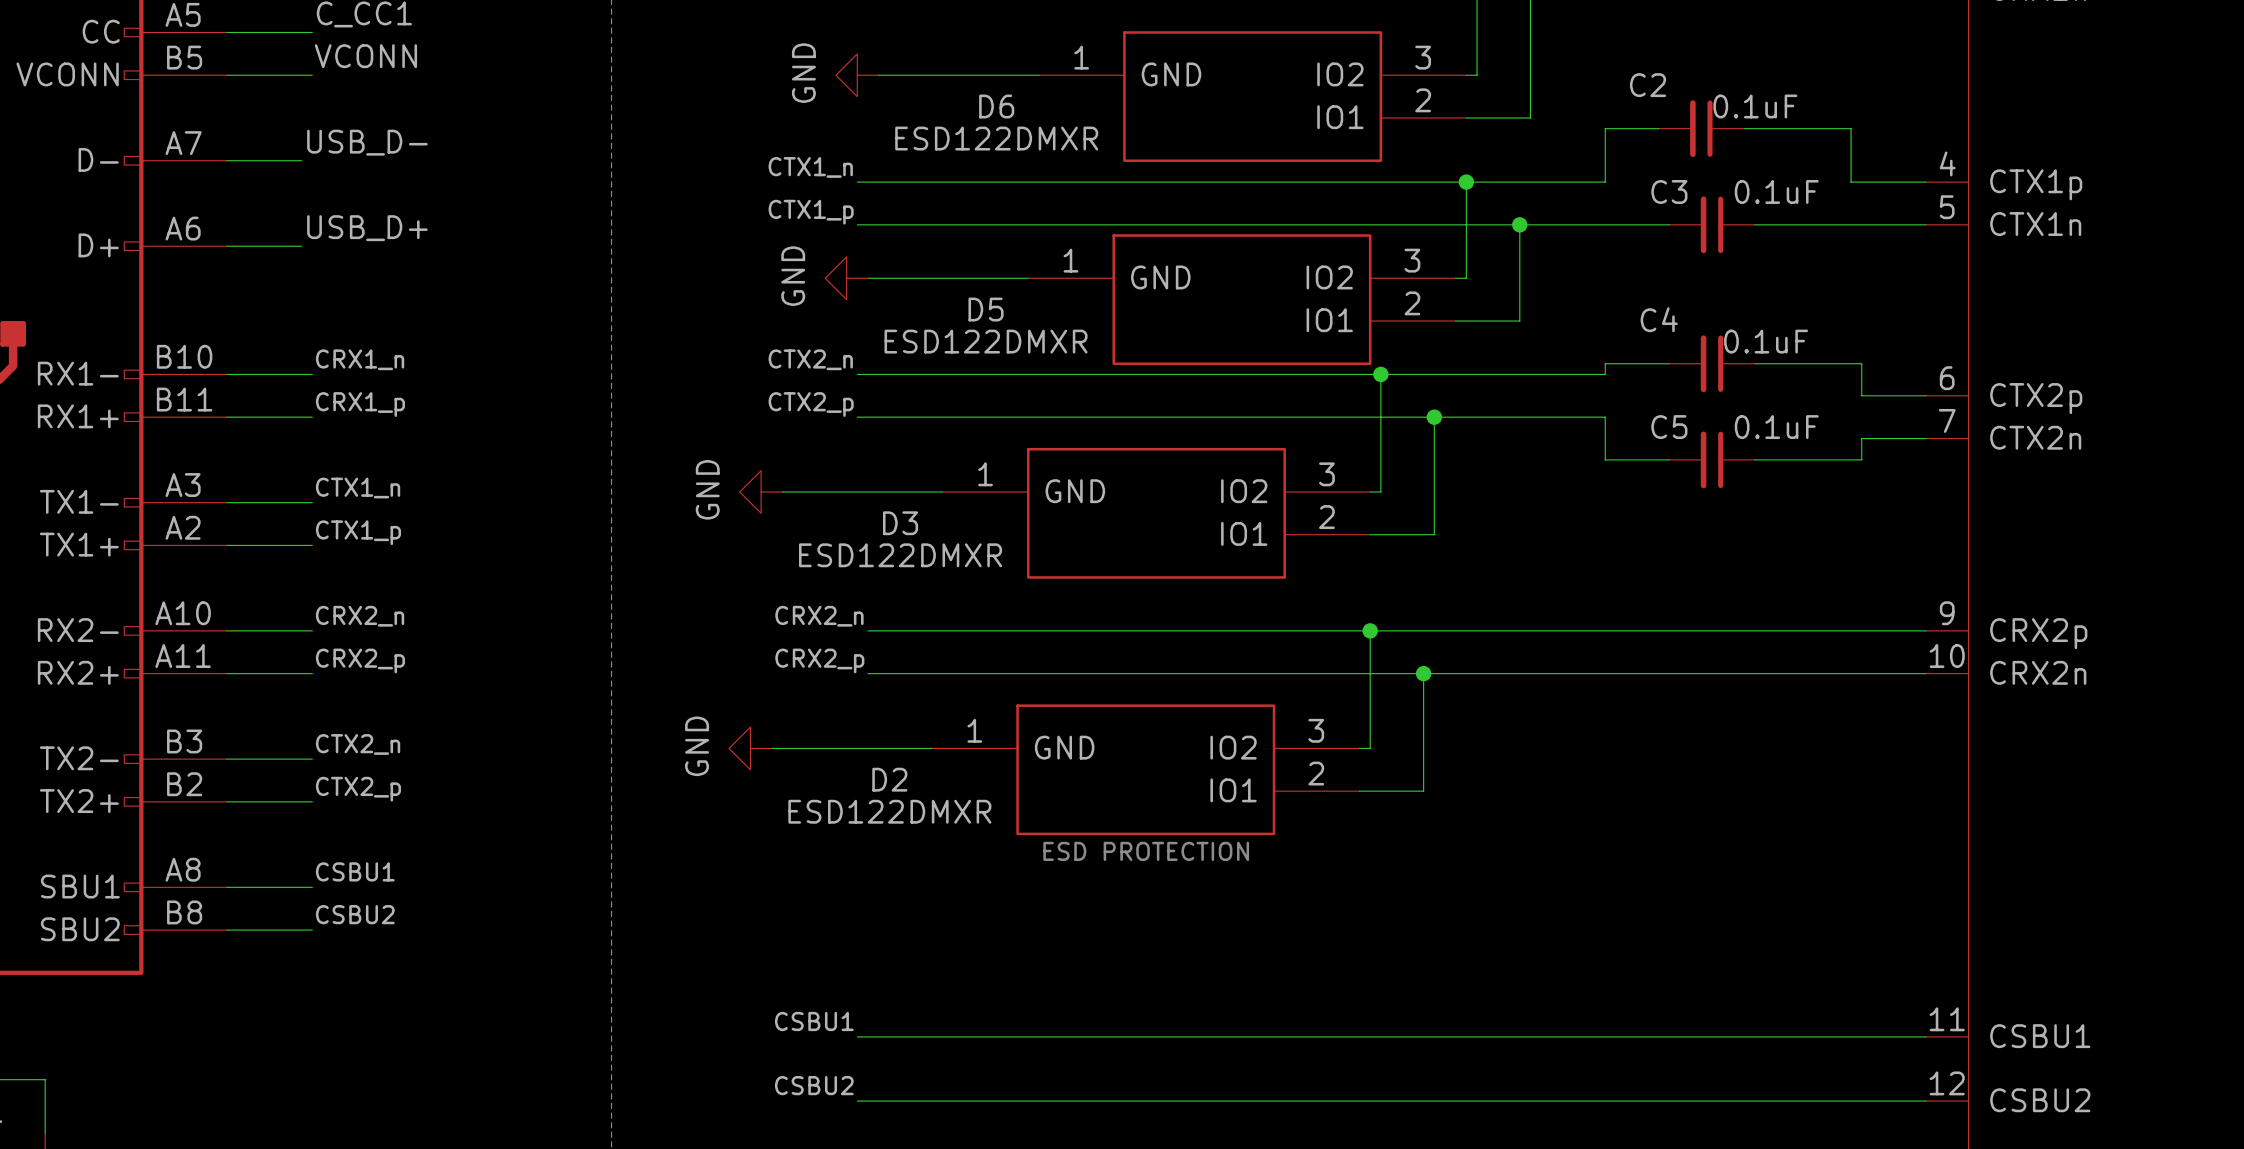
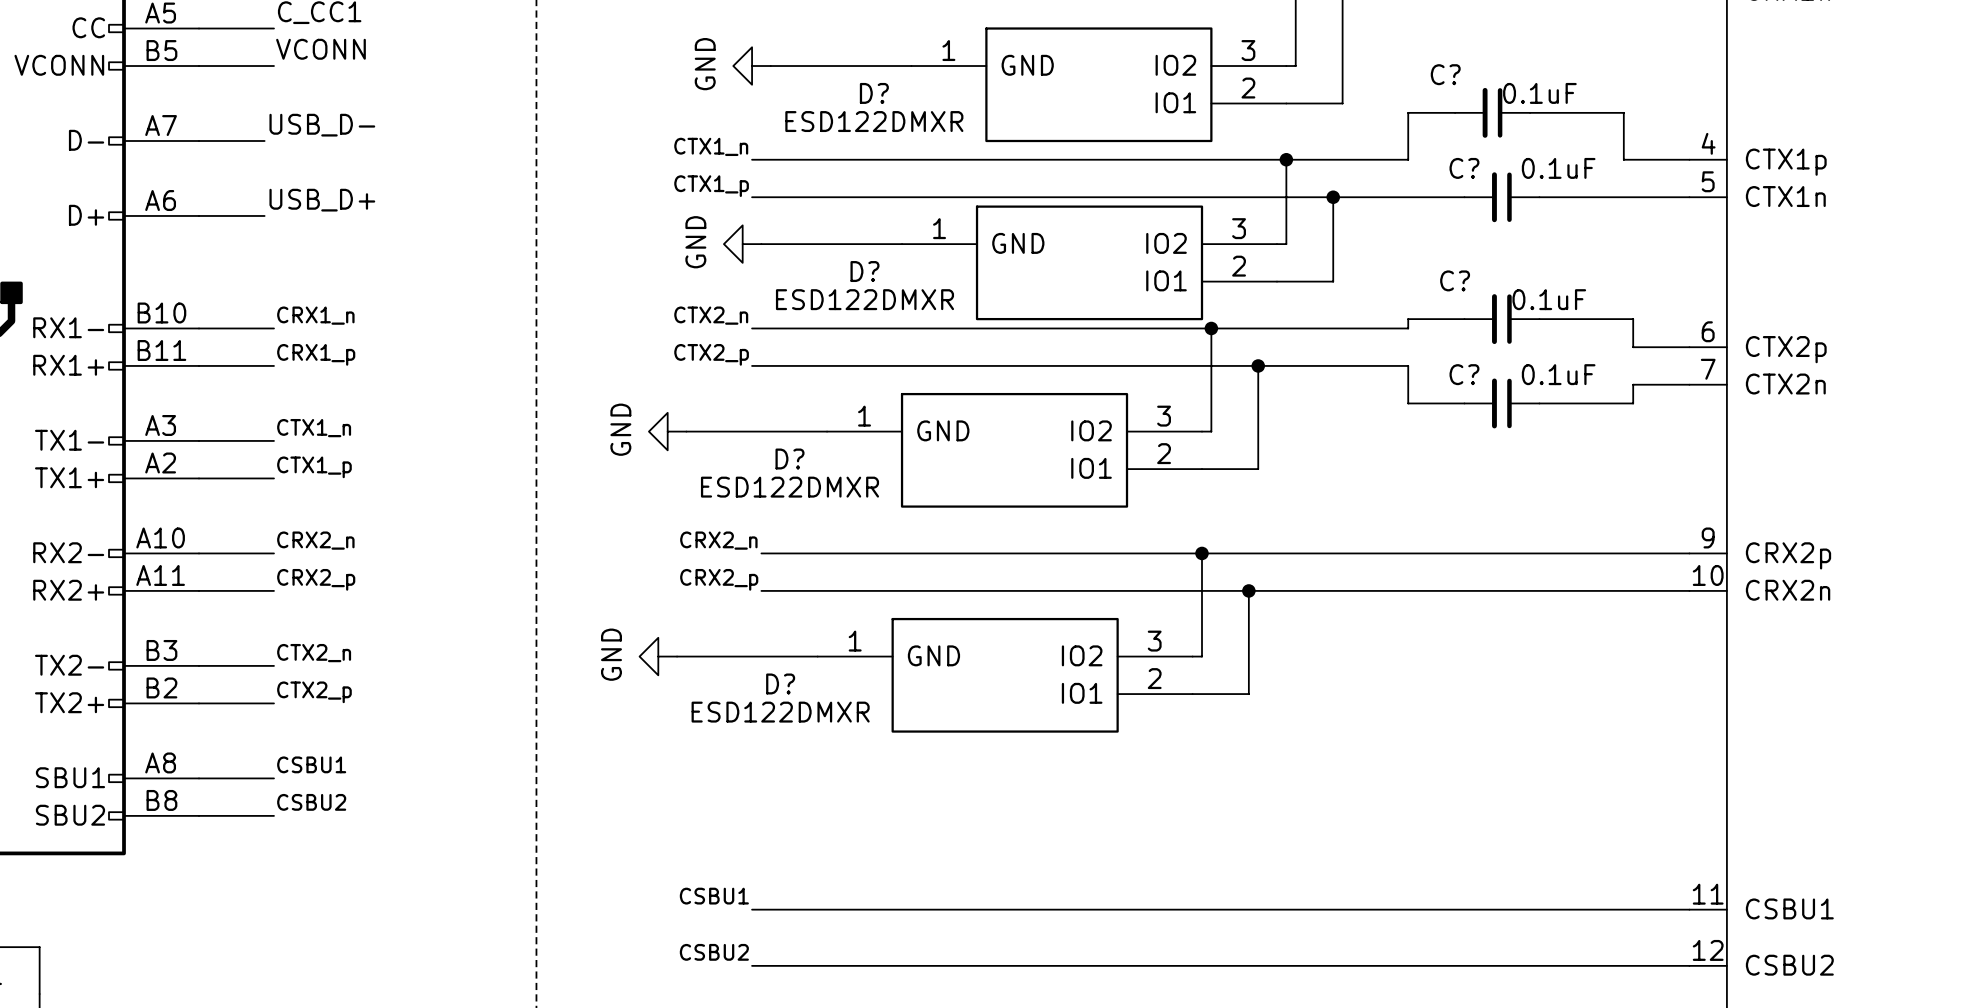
C2 name: C2 (1648, 85) -> C? (1445, 74)
D6 name: D6 (996, 106) -> D? (874, 93)
C3 name: C3 (1669, 191) -> C? (1464, 168)
D5 name: D5 (986, 309) -> D? (864, 271)
C4 name: C4 (1659, 319) -> C? (1455, 280)
C5 name: C5 (1669, 427) -> C? (1464, 374)
D3 name: D3 (900, 523) -> D? (789, 459)
D2 name: D2 (889, 779) -> D? (780, 683)
text: ESD PROTECTION (1146, 851) -> none

